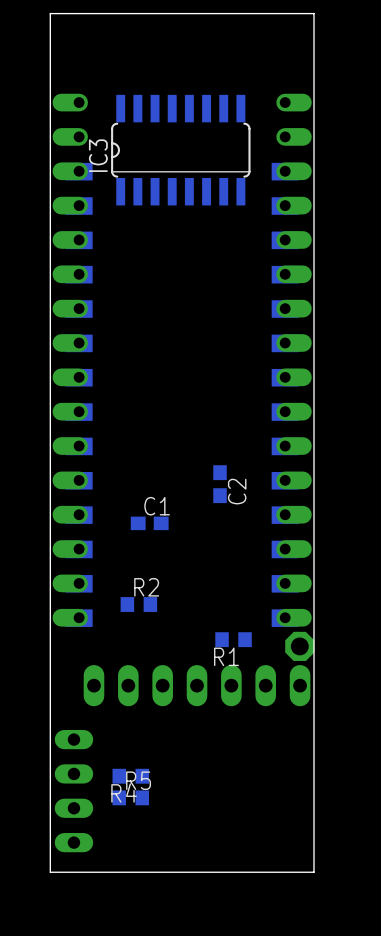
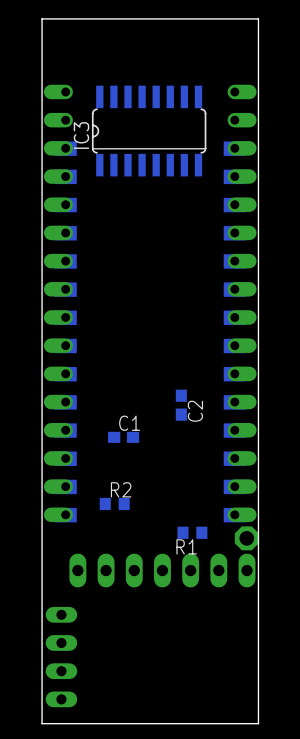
R4: (130, 776) -> none
R5: (130, 797) -> none

